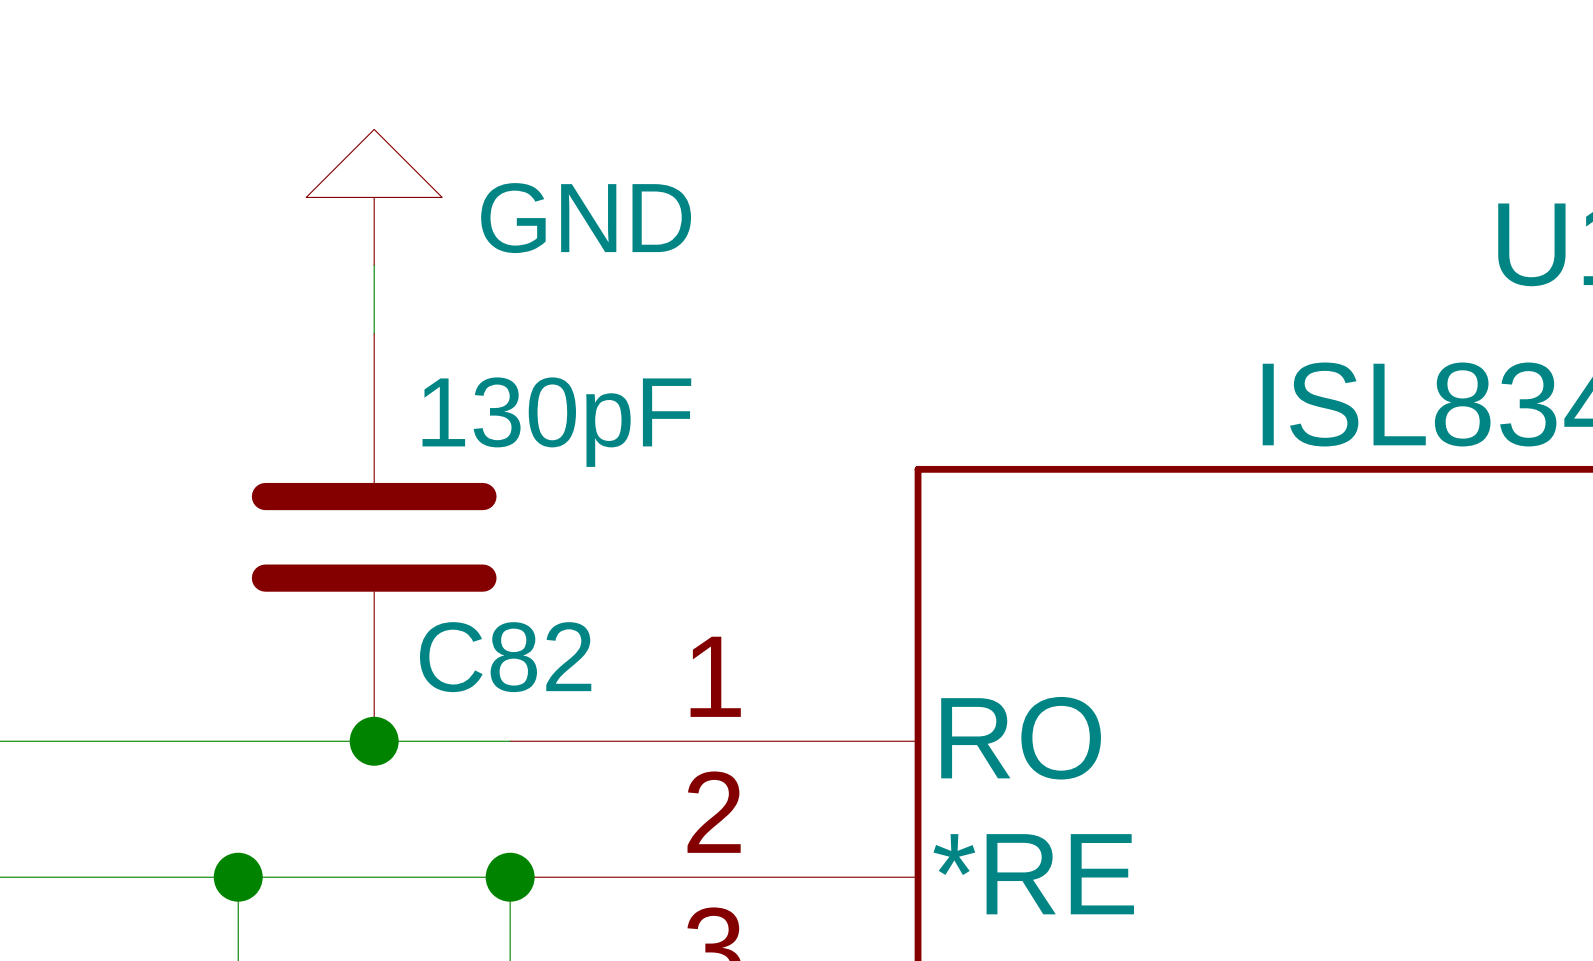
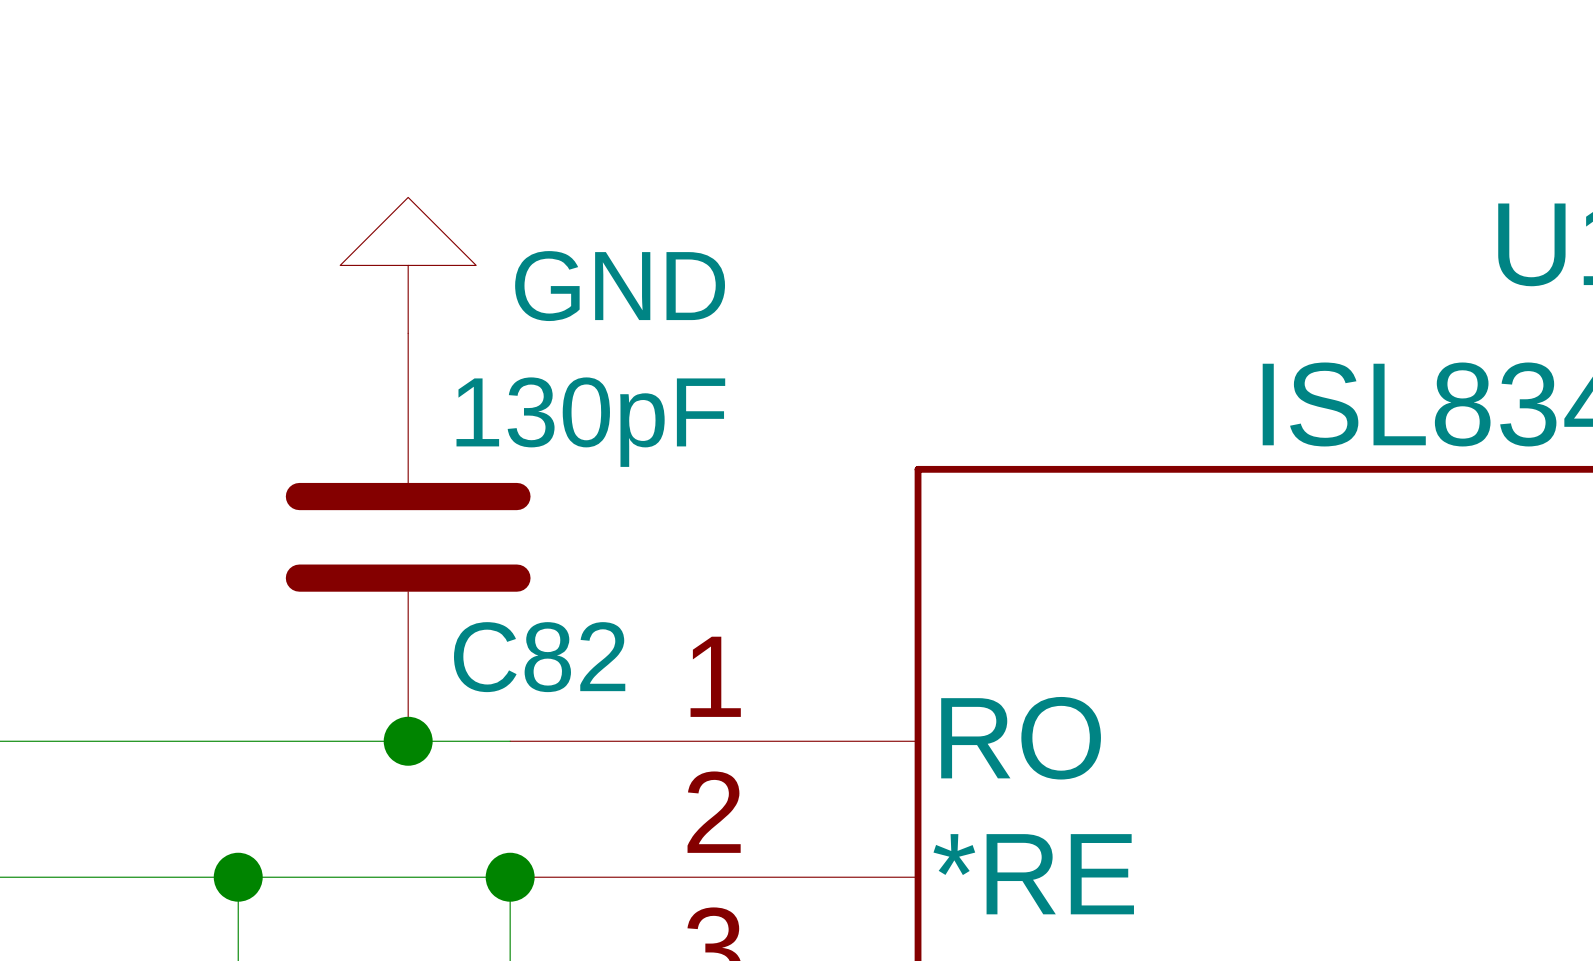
power symbol position: GND (374, 197) -> GND (408, 265)
wire: (374, 265) (374, 333) -> none
C82 position: (374, 537) -> (408, 537)
junction position: (374, 741) -> (408, 741)

